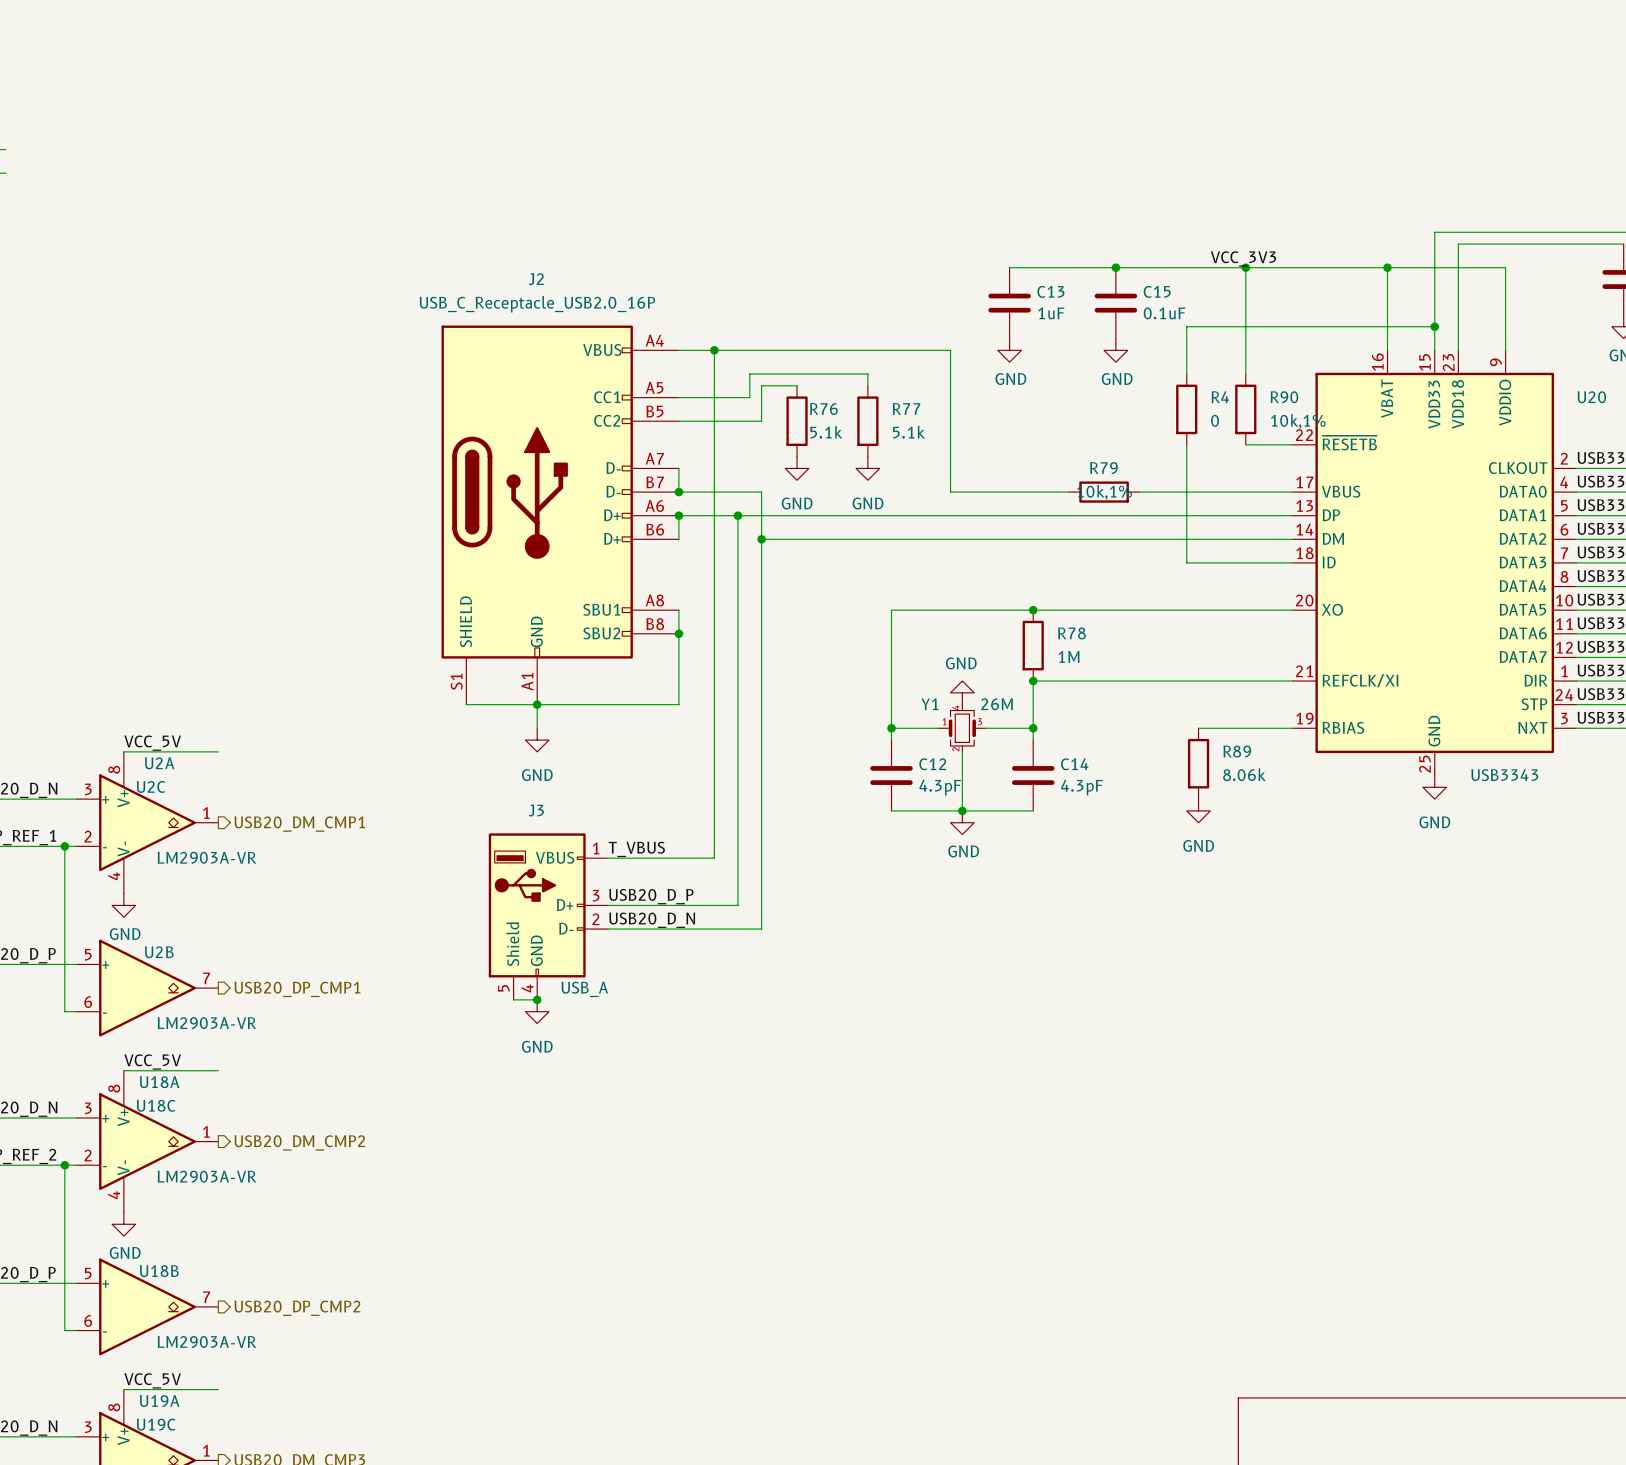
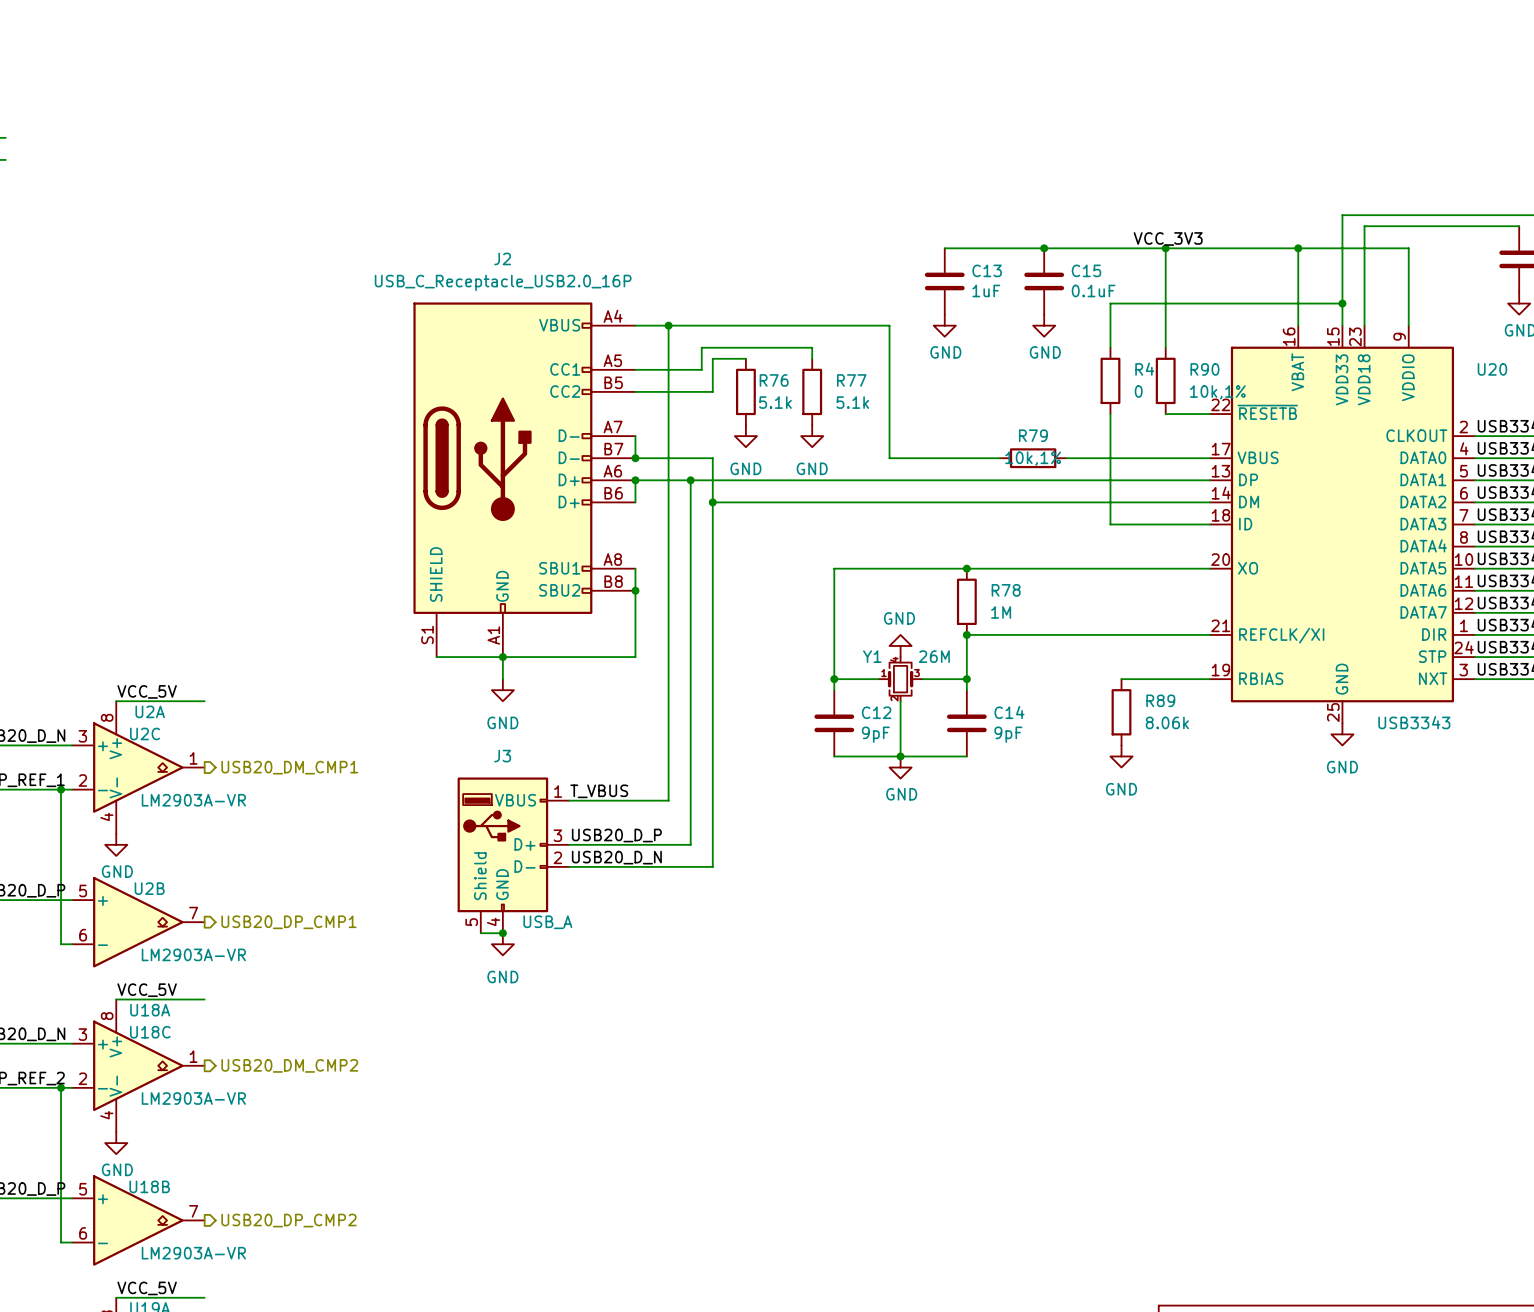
C12 value: 4.3pF (940, 787) -> 9pF (875, 734)
C14 value: 4.3pF (1081, 787) -> 9pF (1008, 734)

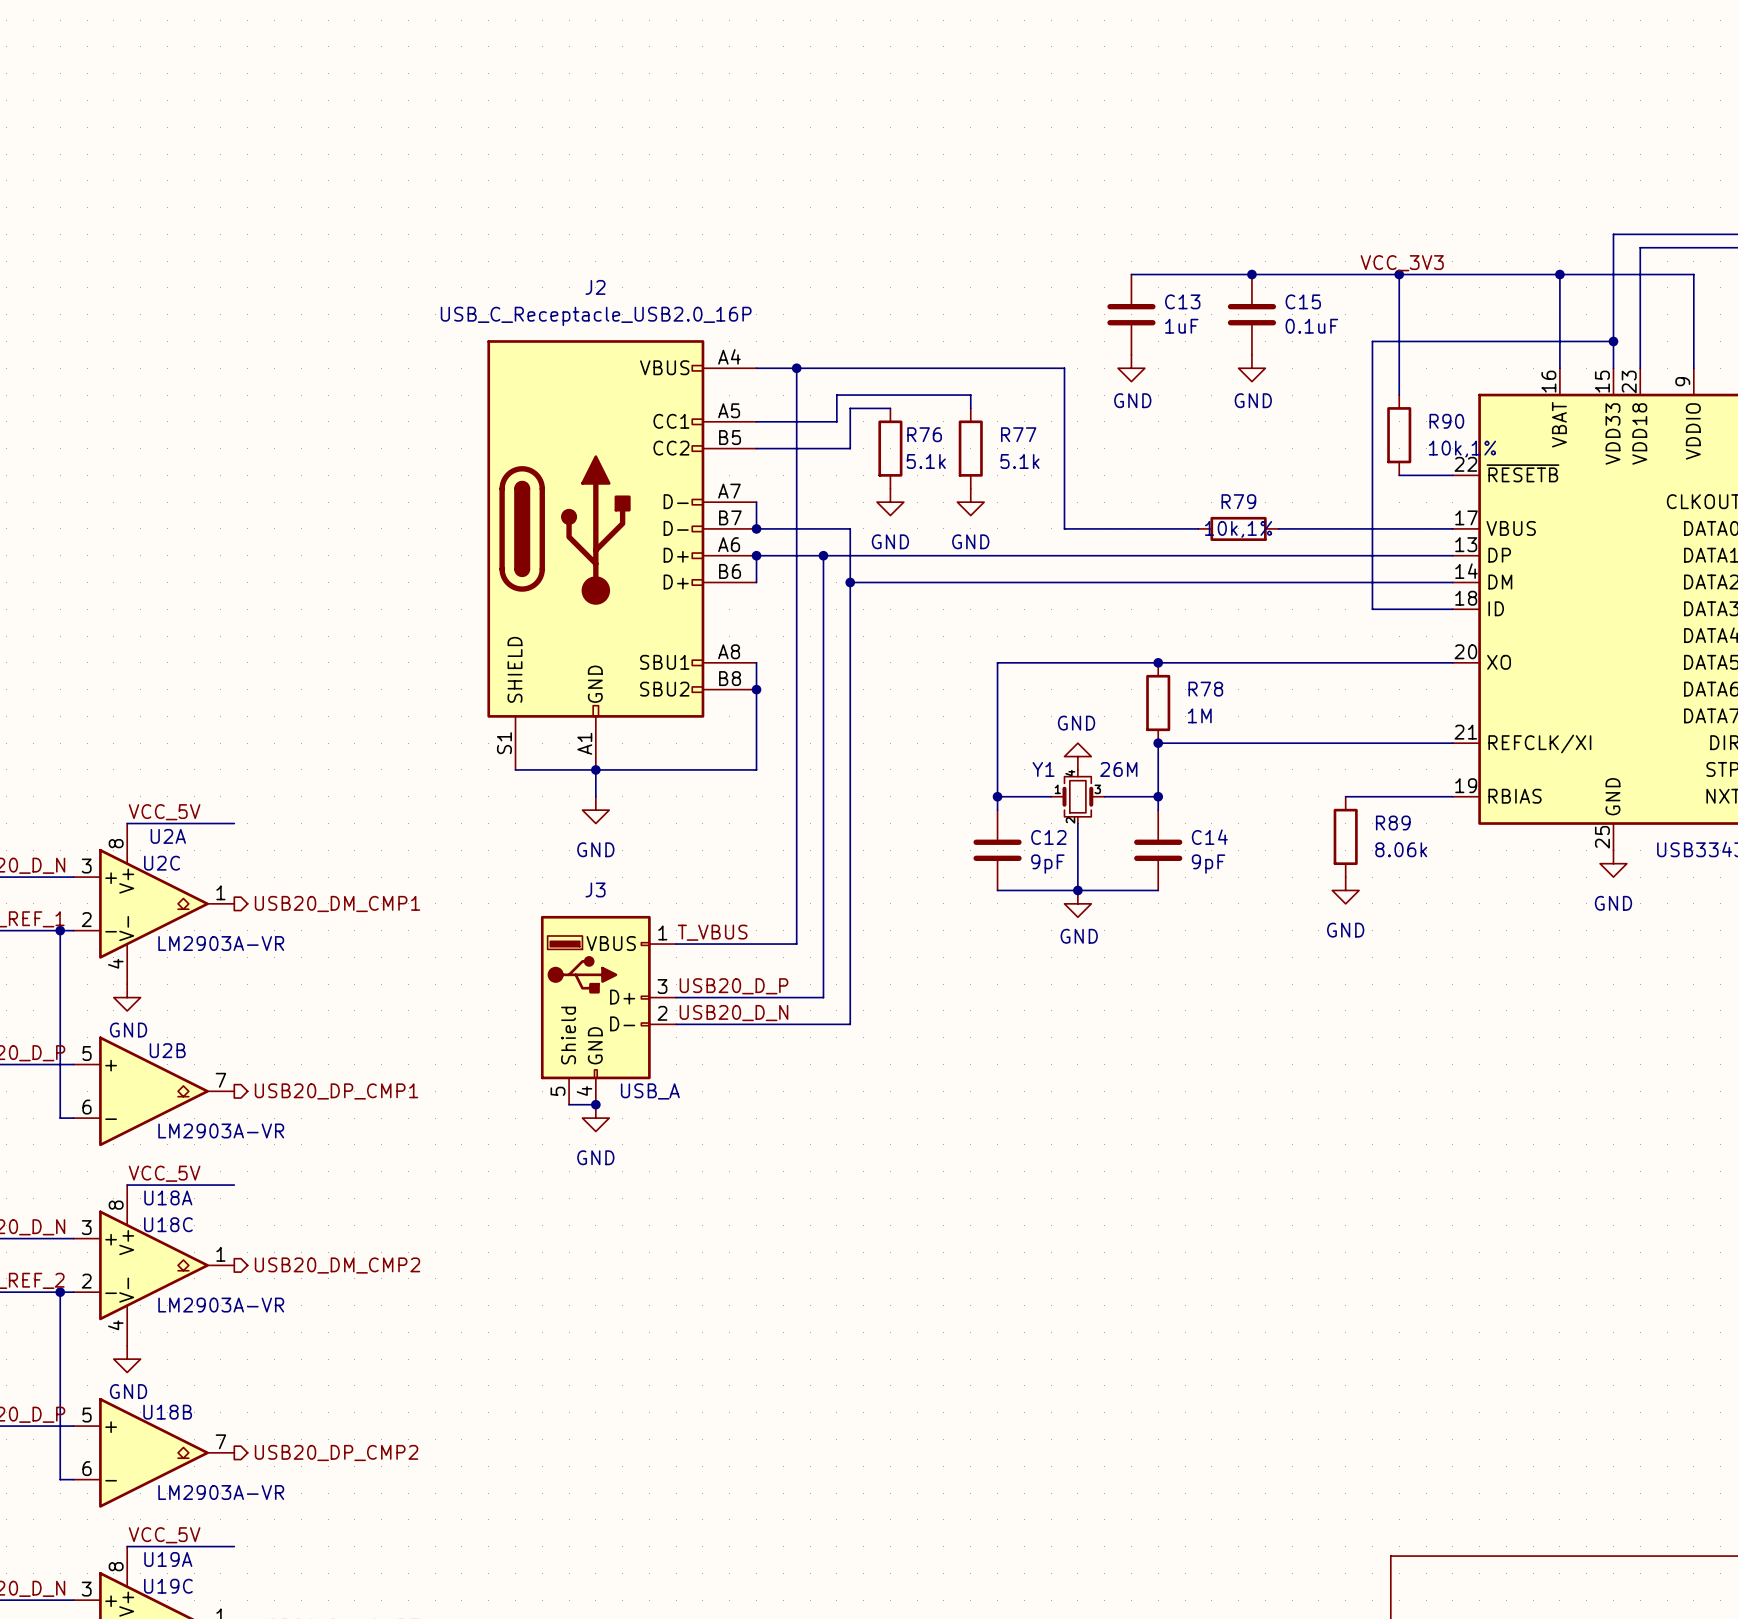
wire: (1143, 303) (1110, 303) (1110, 347) -> none
R4: 0 (1110, 380) -> none
wire: (1110, 414) (1110, 524) (1143, 524) -> (1372, 341) (1372, 609)

